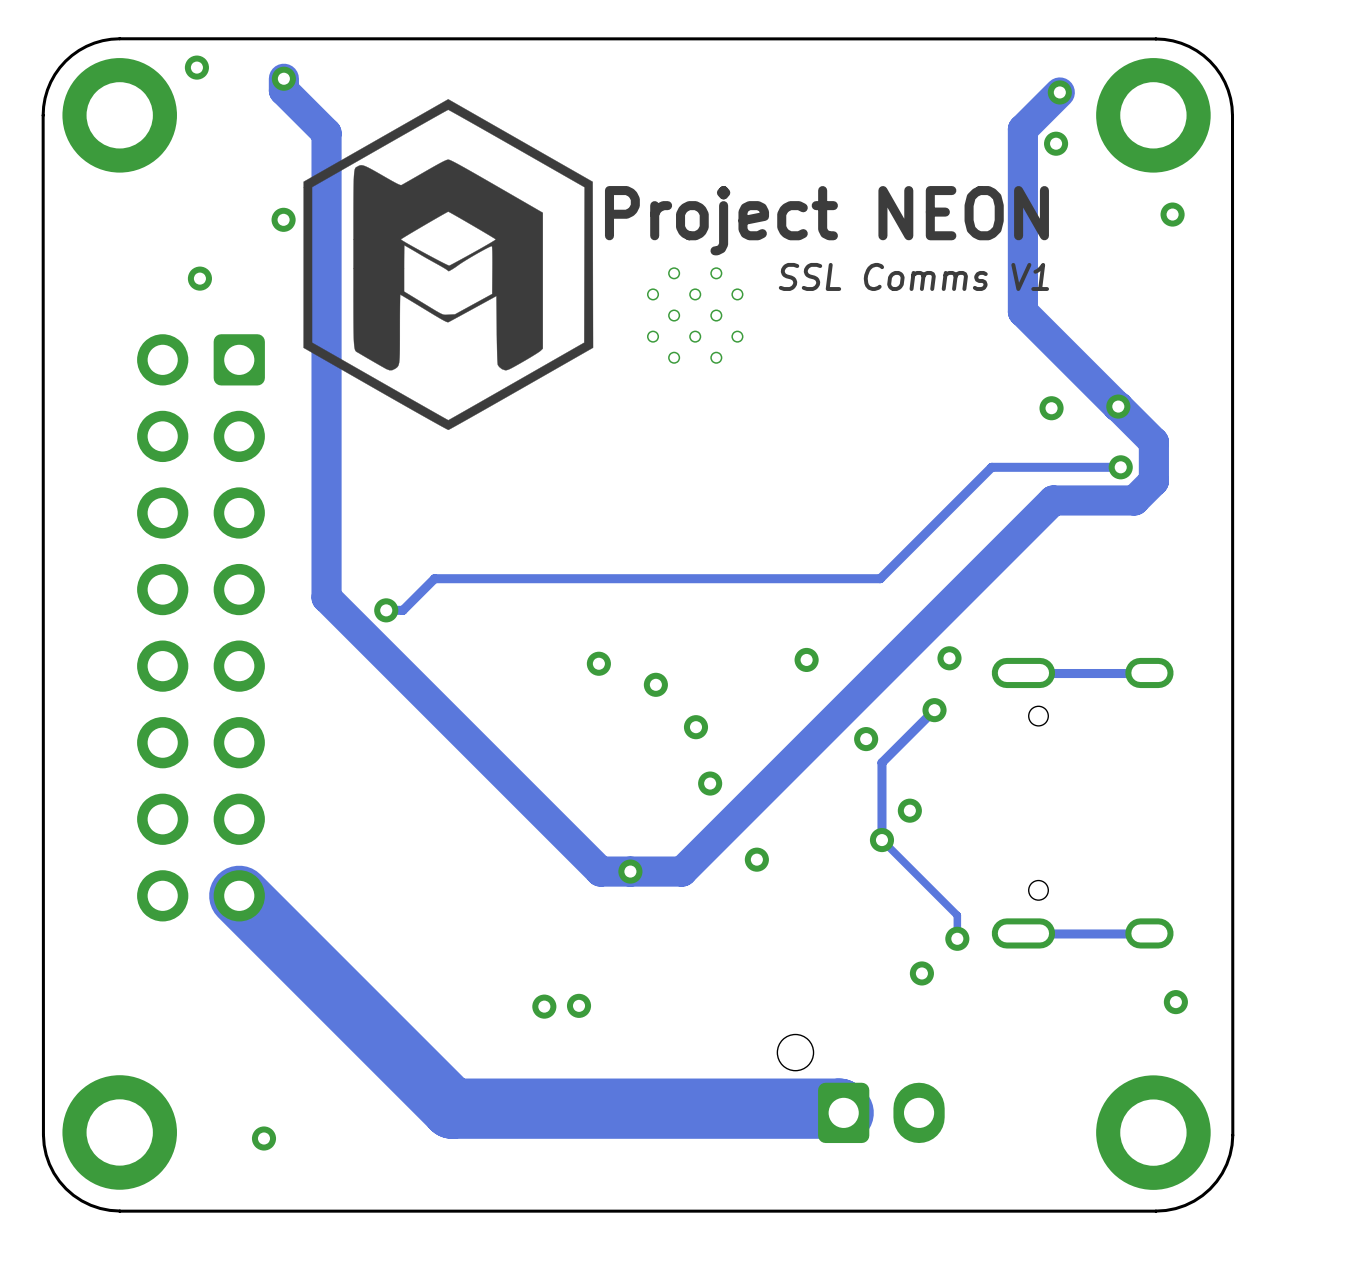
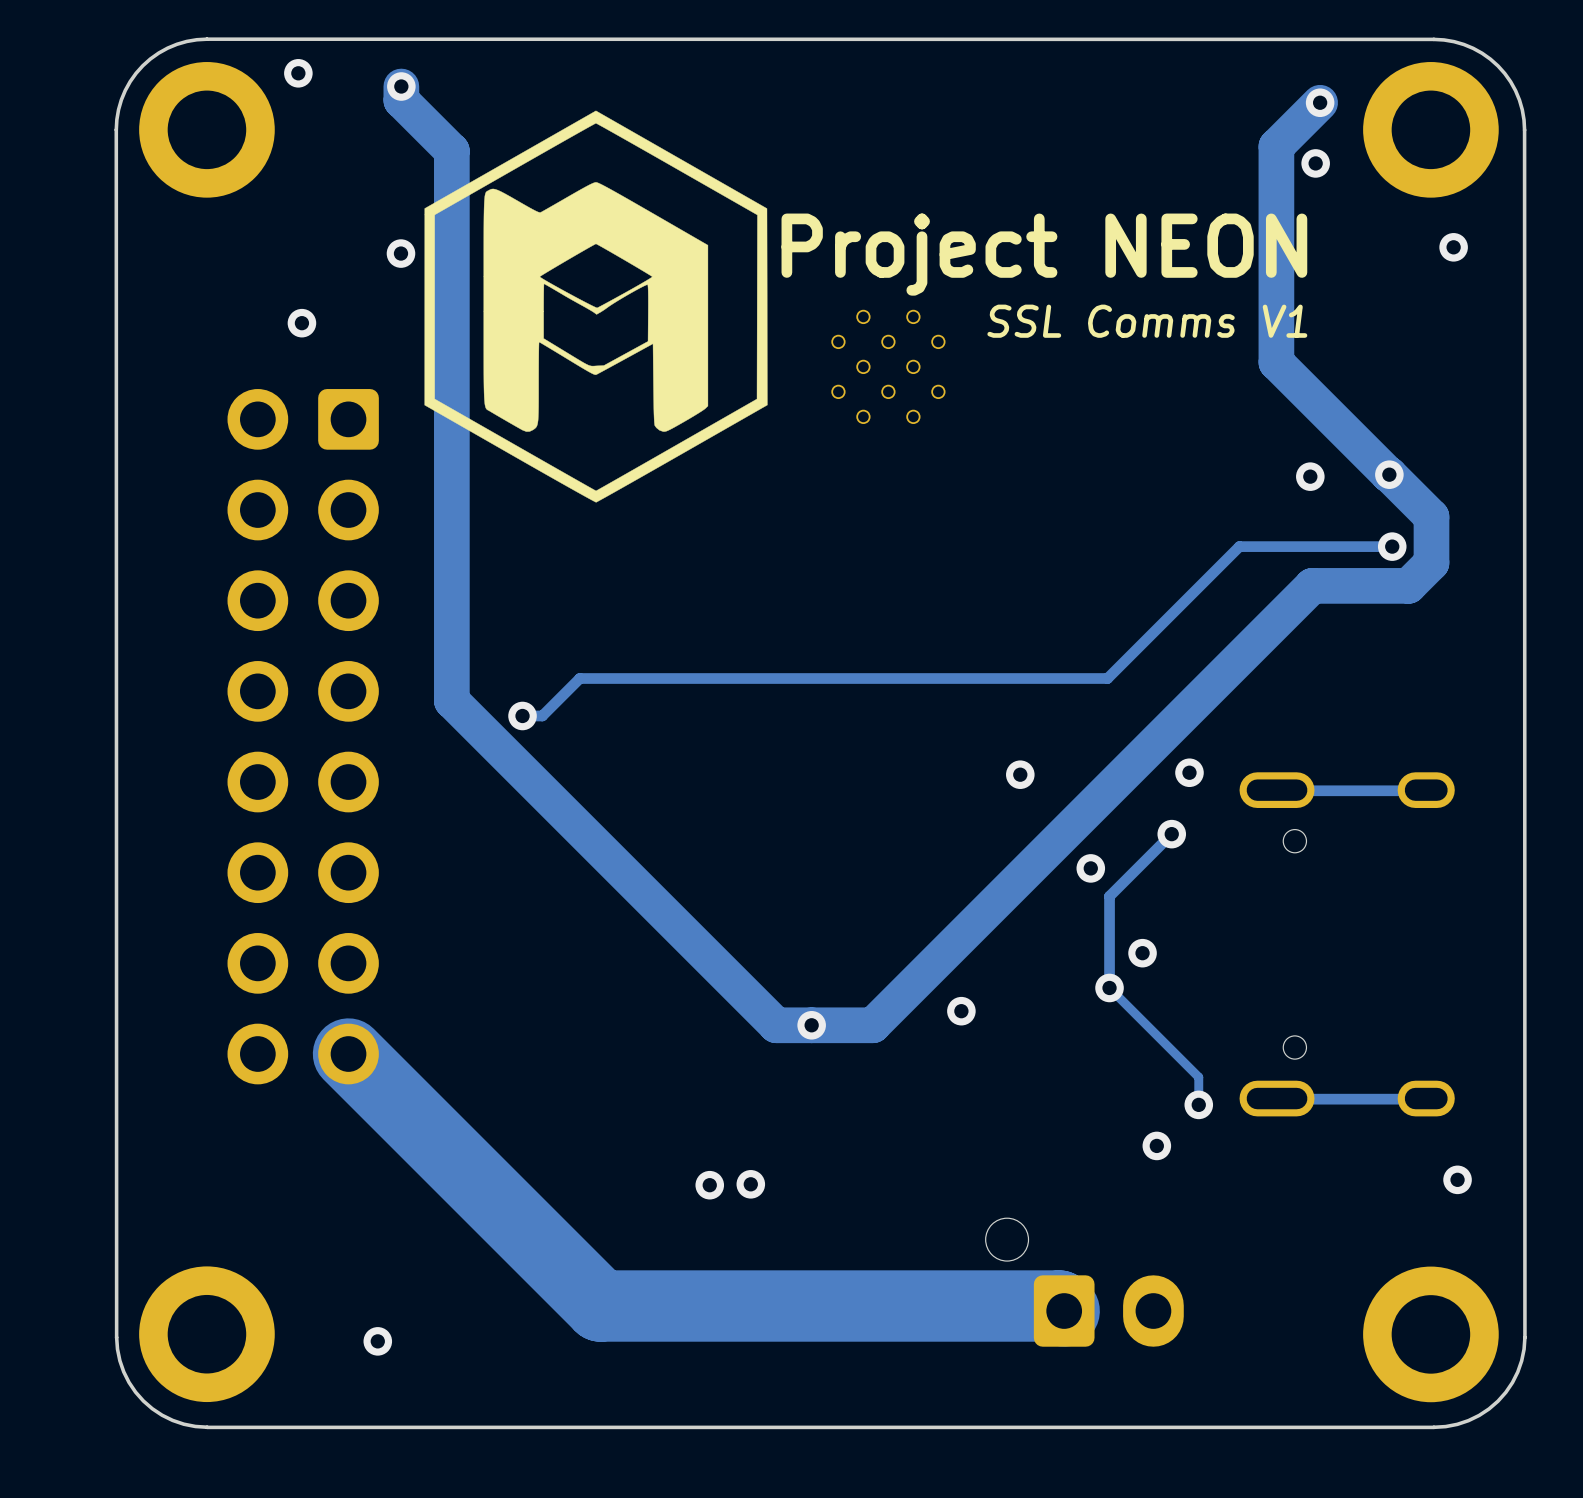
via: (598, 663) -> none
via: (655, 684) -> none
via: (695, 727) -> none
via: (710, 783) -> none

